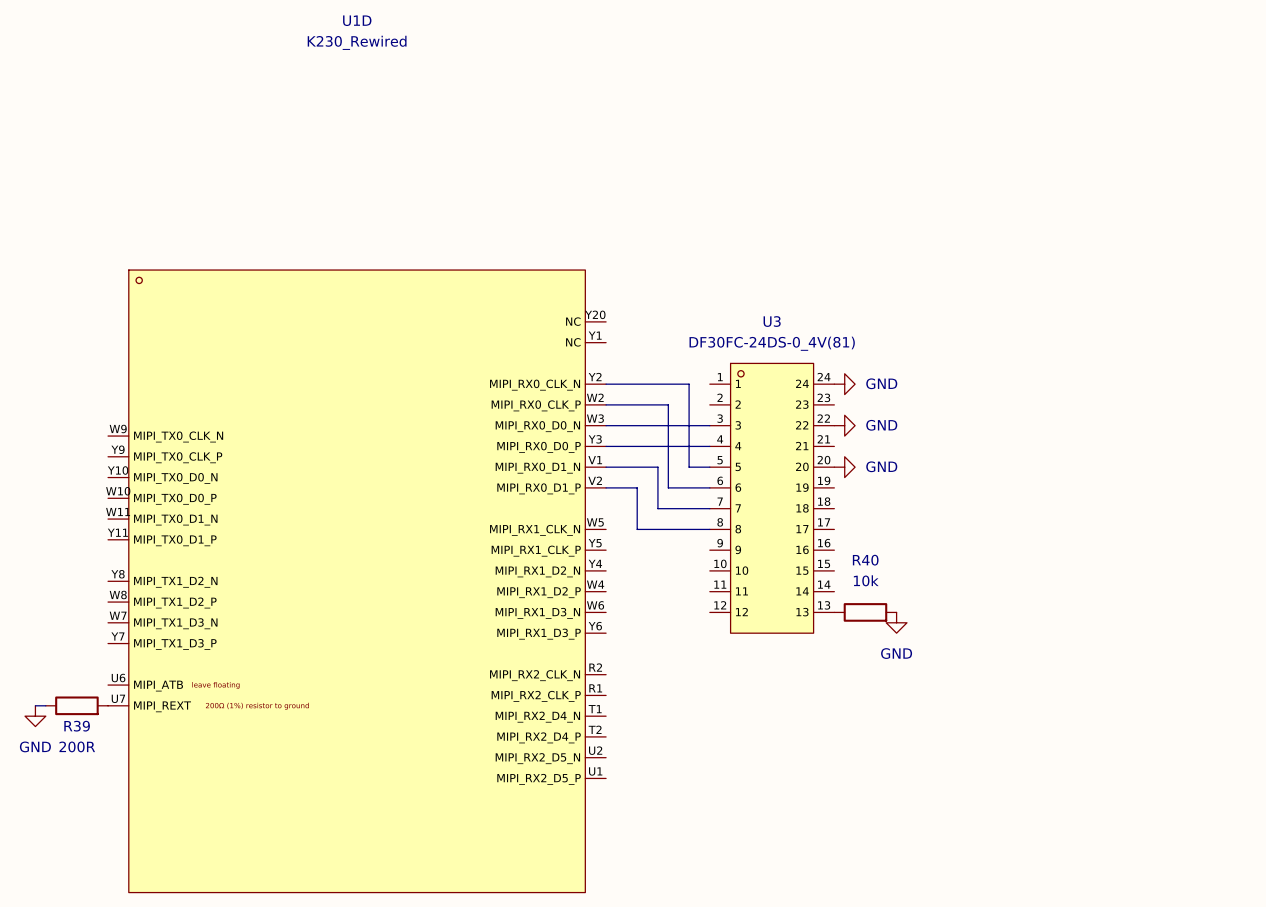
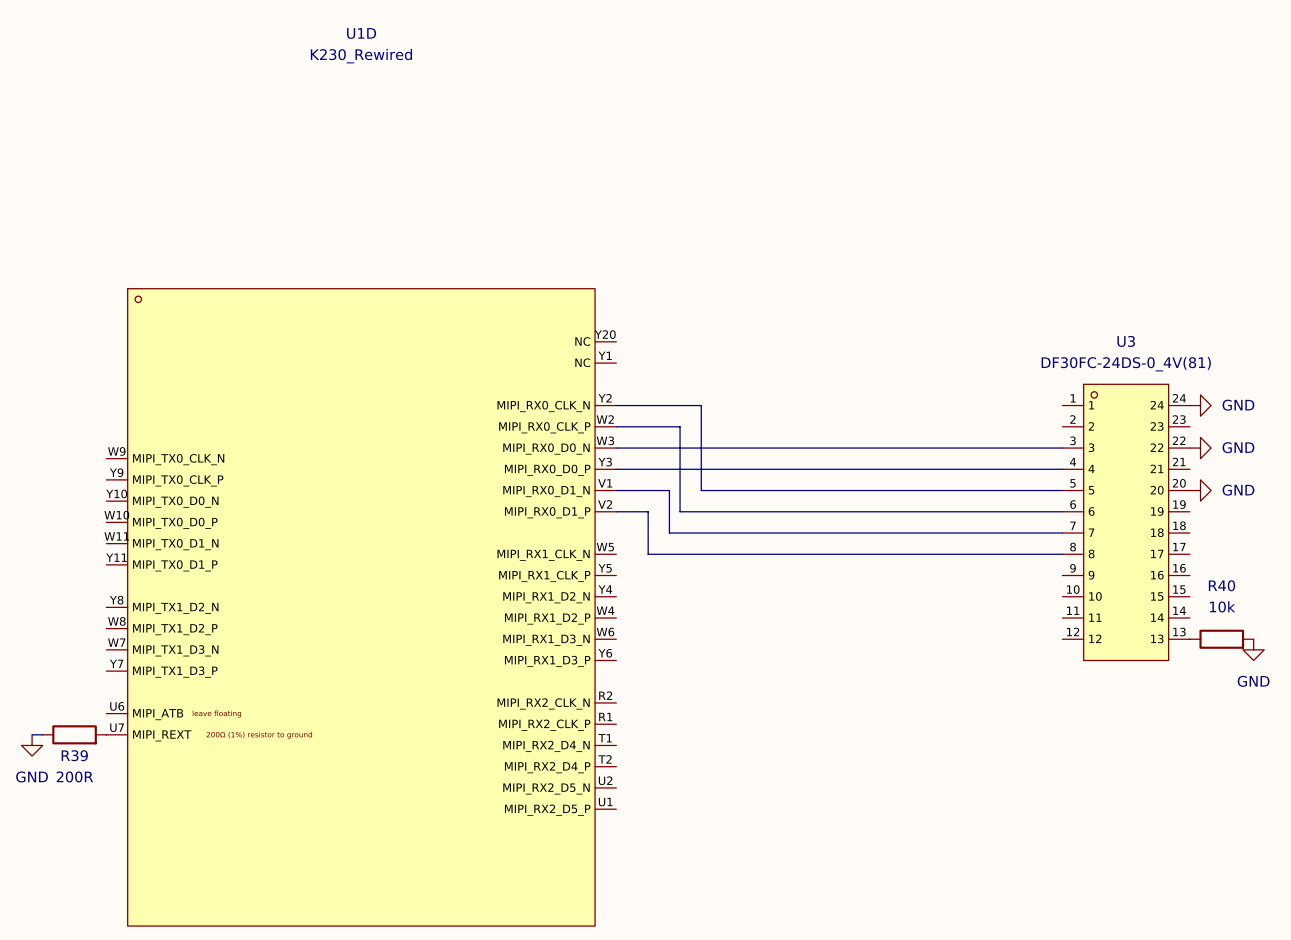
power symbol: GND (844, 384) -> none
power symbol: none -> GND (1200, 405)
wire: none -> (722, 448) (1062, 448)
power symbol: GND (844, 425) -> none
power symbol: none -> GND (1200, 448)
wire: none -> (722, 469) (1062, 469)
wire: none -> (722, 490) (1062, 490)
power symbol: GND (844, 467) -> none
power symbol: none -> GND (1200, 490)
wire: none -> (722, 511) (1062, 511)
U3 position: (772, 498) -> (1126, 522)
wire: none -> (722, 533) (1062, 533)
wire: none -> (722, 554) (1062, 554)
R40 position: (865, 612) -> (1221, 639)
power symbol: GND (896, 622) -> none
power symbol: none -> GND (1253, 649)

